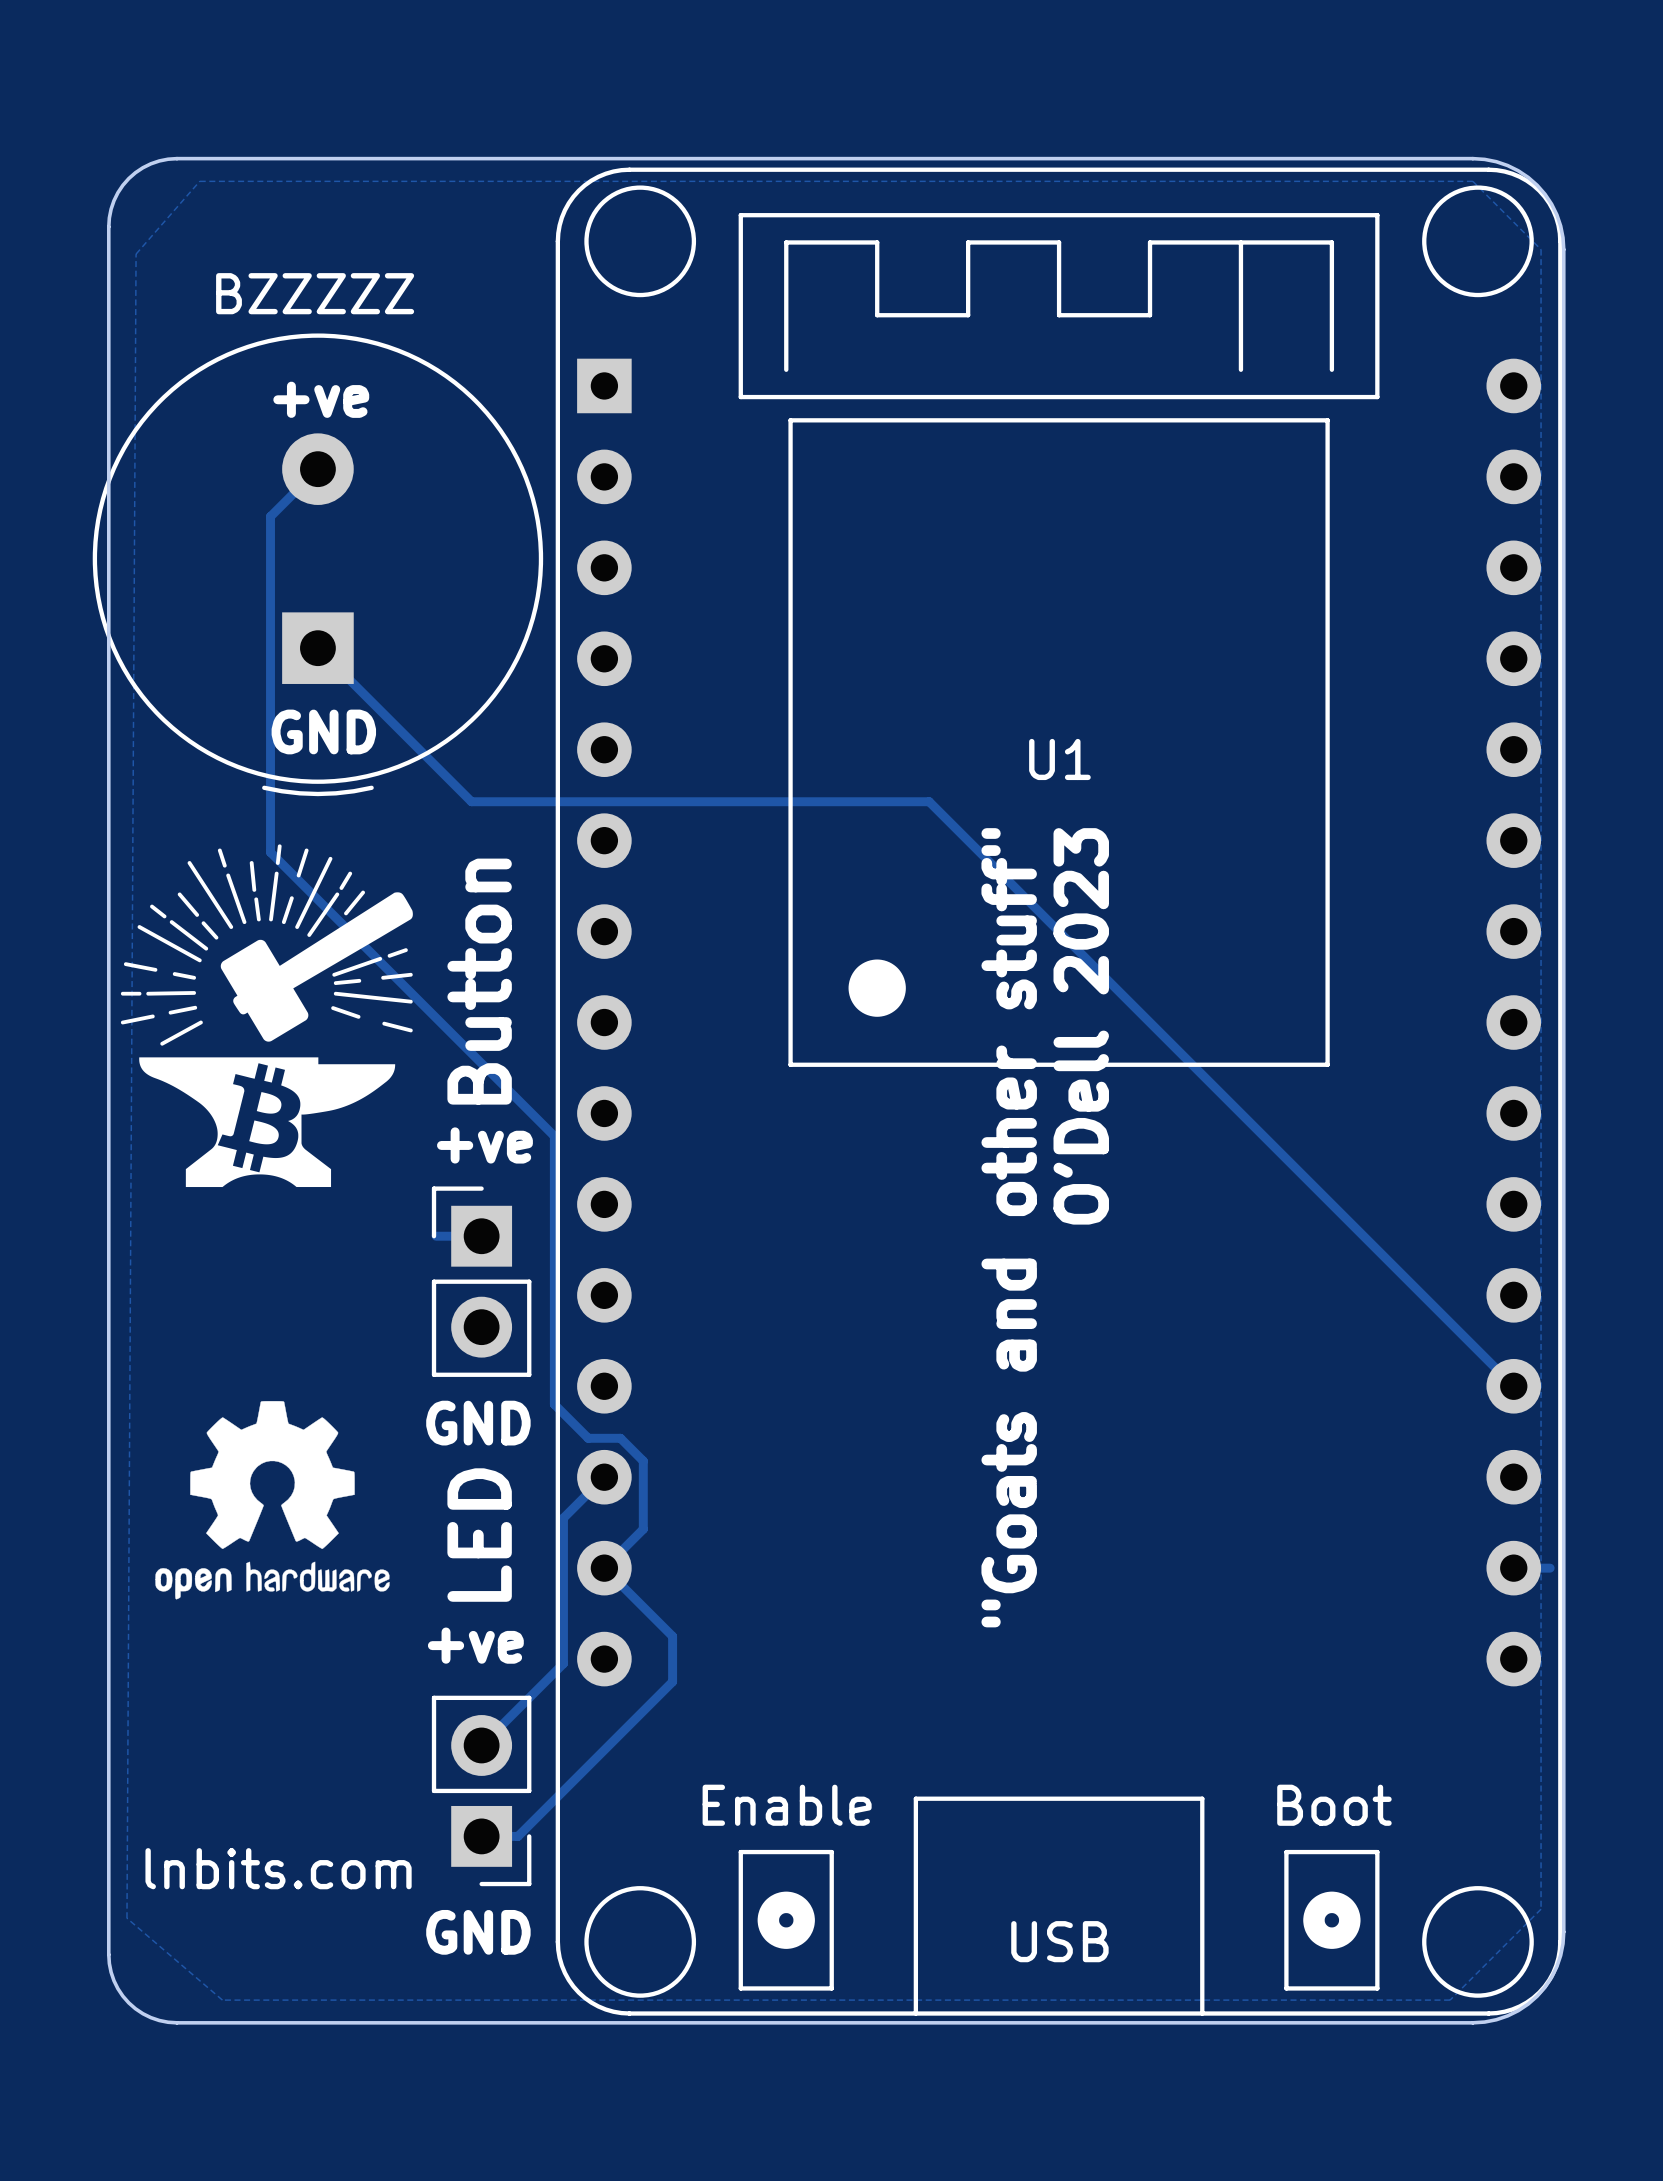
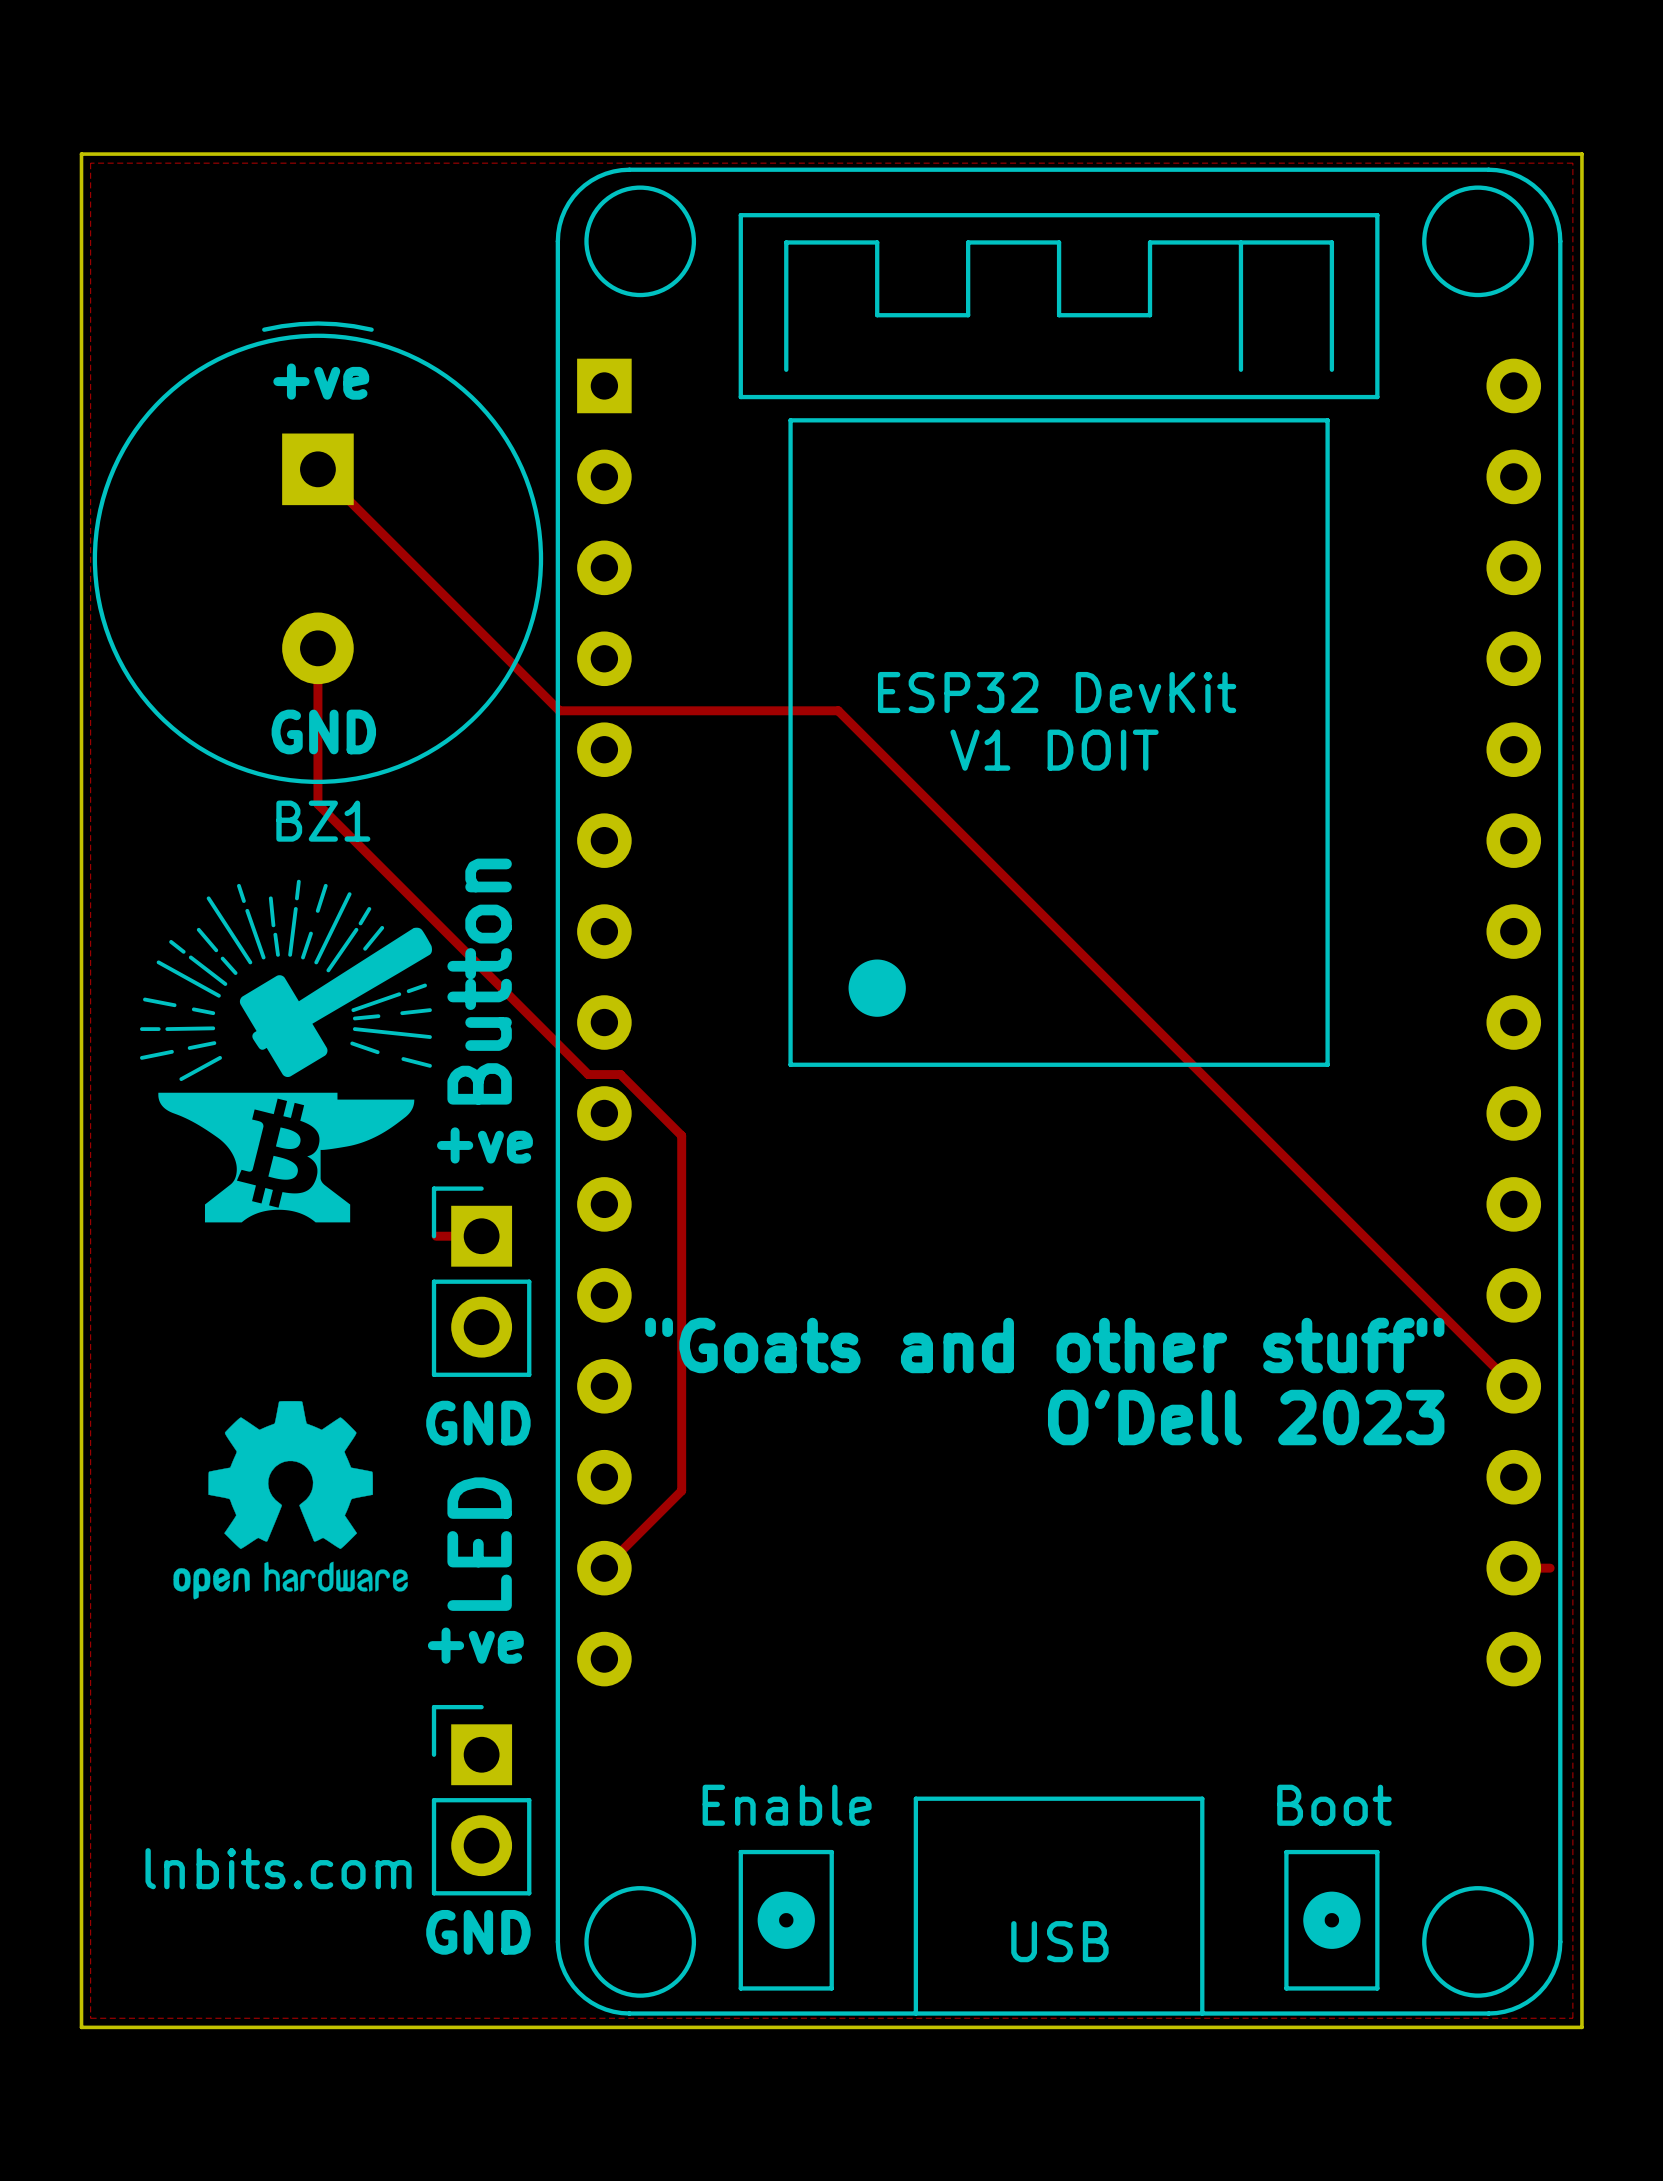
board edge: (176, 158) (1472, 158) (1484, 159) (1507, 165) (1528, 177) (1544, 194) (1556, 214) (1560, 226) (1563, 249) (1563, 1931) (1560, 1955) (1551, 1977) (1544, 1987) (1528, 2004) (1518, 2010) (1496, 2019) (1472, 2022) (176, 2022) (159, 2020) (142, 2013) (122, 1996) (113, 1980) (108, 1954) (108, 226) (113, 200) (128, 178) (150, 163) (176, 158) -> (81, 154) (81, 2027) (1581, 2027) (1581, 154) (81, 154)
zone outline: (199, 181) (136, 254) (126, 1918) (222, 2000) (1450, 2000) (1541, 1909) (1541, 249) (1472, 181) (199, 181) -> (90, 163) (90, 2018) (1572, 2018) (1572, 163) (90, 163)
text position: +ve (321, 399) -> +ve (321, 381)
track: (317, 469) (270, 516) (270, 852) (554, 1136) (554, 1404) (588, 1438) (620, 1438) (643, 1461) (643, 1529) -> (317, 648) (317, 804) (588, 1074) (620, 1074) (681, 1135) (681, 1490) (643, 1529)
BZ1: none -> (317, 552)
BZZZZZ: (317, 564) -> none
track: (317, 648) (471, 801) (929, 801) -> (317, 469) (559, 710) (838, 710) (929, 801)
text: none -> ESP32 DevKit (1057, 692)
text: none -> V1 DOIT (1054, 750)
U1 name: U1 (1059, 759) -> none
drawing position: (278, 854) -> (297, 890)
drawing: [295, 856, 333, 929] -> none
drawing position: (222, 858) -> (241, 893)
drawing position: (302, 862) -> (321, 898)
drawing position: (252, 876) -> (272, 911)
drawing position: (345, 880) -> (364, 916)
drawing: none -> [314, 892, 352, 965]
drawing position: (210, 895) -> (229, 930)
drawing position: (273, 896) -> (292, 931)
drawing position: (236, 898) -> (255, 934)
drawing position: (354, 902) -> (373, 938)
drawing position: (188, 904) -> (207, 940)
drawing position: (257, 909) -> (276, 944)
drawing position: (287, 910) -> (306, 945)
drawing position: (158, 911) -> (177, 946)
drawing position: (323, 914) -> (342, 950)
drawing position: (209, 930) -> (229, 965)
drawing position: (188, 935) -> (208, 970)
drawing position: (169, 943) -> (188, 979)
drawing position: (397, 952) -> (416, 988)
drawing position: (140, 966) -> (159, 1002)
drawing position: (316, 966) -> (335, 1002)
drawing position: (357, 966) -> (376, 1002)
drawing position: (184, 975) -> (203, 1011)
drawing position: (396, 976) -> (416, 1011)
drawing position: (347, 981) -> (366, 1017)
drawing position: (131, 993) -> (150, 1029)
drawing position: (171, 993) -> (190, 1028)
drawing position: (373, 997) -> (392, 1033)
drawing position: (182, 1010) -> (202, 1045)
drawing position: (345, 1012) -> (364, 1047)
drawing position: (137, 1019) -> (156, 1054)
text rotation: 0° (1081, 1026) -> 90° clockwise (1246, 1417)
drawing position: (397, 1027) -> (416, 1062)
drawing position: (181, 1033) -> (200, 1068)
drawing position: (269, 1102) -> (288, 1138)
drawing position: (267, 1122) -> (286, 1157)
drawing position: (263, 1132) -> (283, 1167)
text rotation: 0° (1009, 1227) -> 90° clockwise (1044, 1345)
track: (599, 1472) (604, 1477) (563, 1518) (563, 1663) (481, 1745) -> none
drawing position: (272, 1500) -> (290, 1500)
track: (599, 1563) (672, 1636) (672, 1681) (518, 1836) (481, 1836) -> none
part rotation: 0° (481, 1790) -> 180° (481, 1800)

